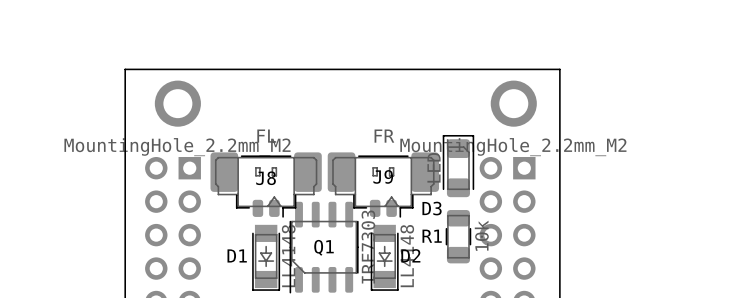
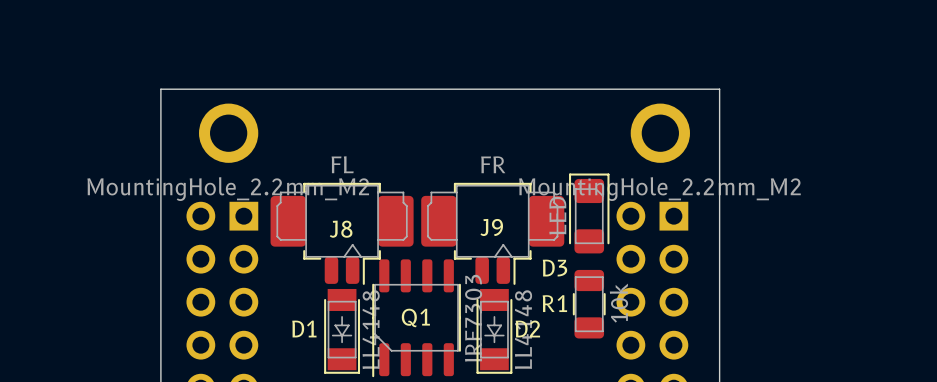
J8 footprint: [210, 152, 322, 218] -> [270, 182, 414, 285]
J9 footprint: [327, 152, 440, 218] -> [421, 182, 565, 285]

